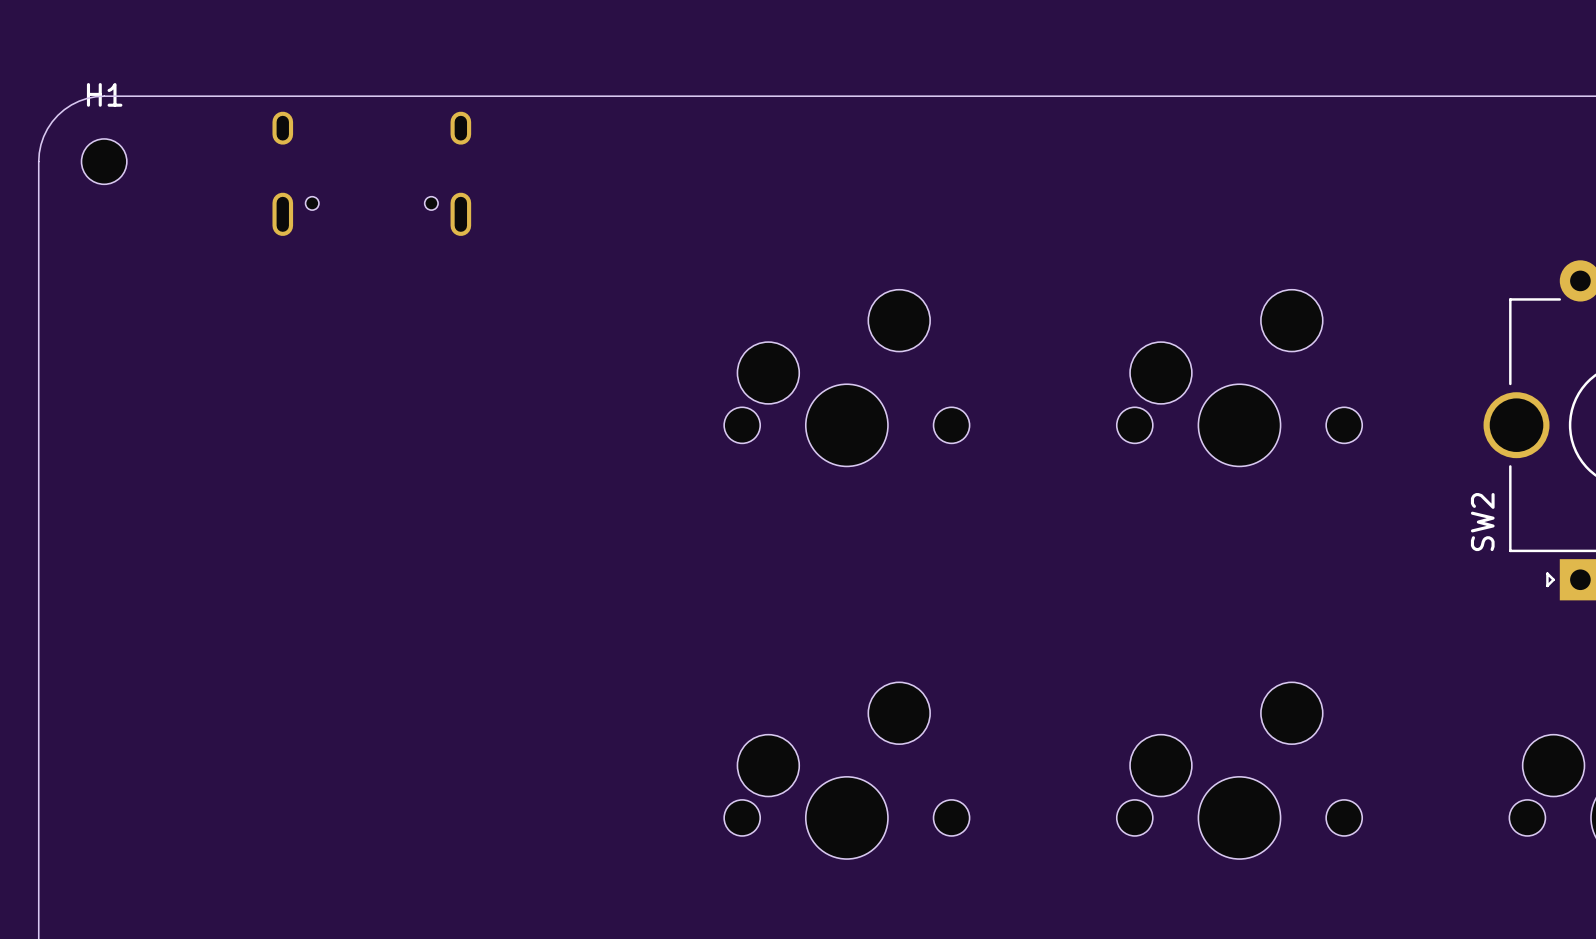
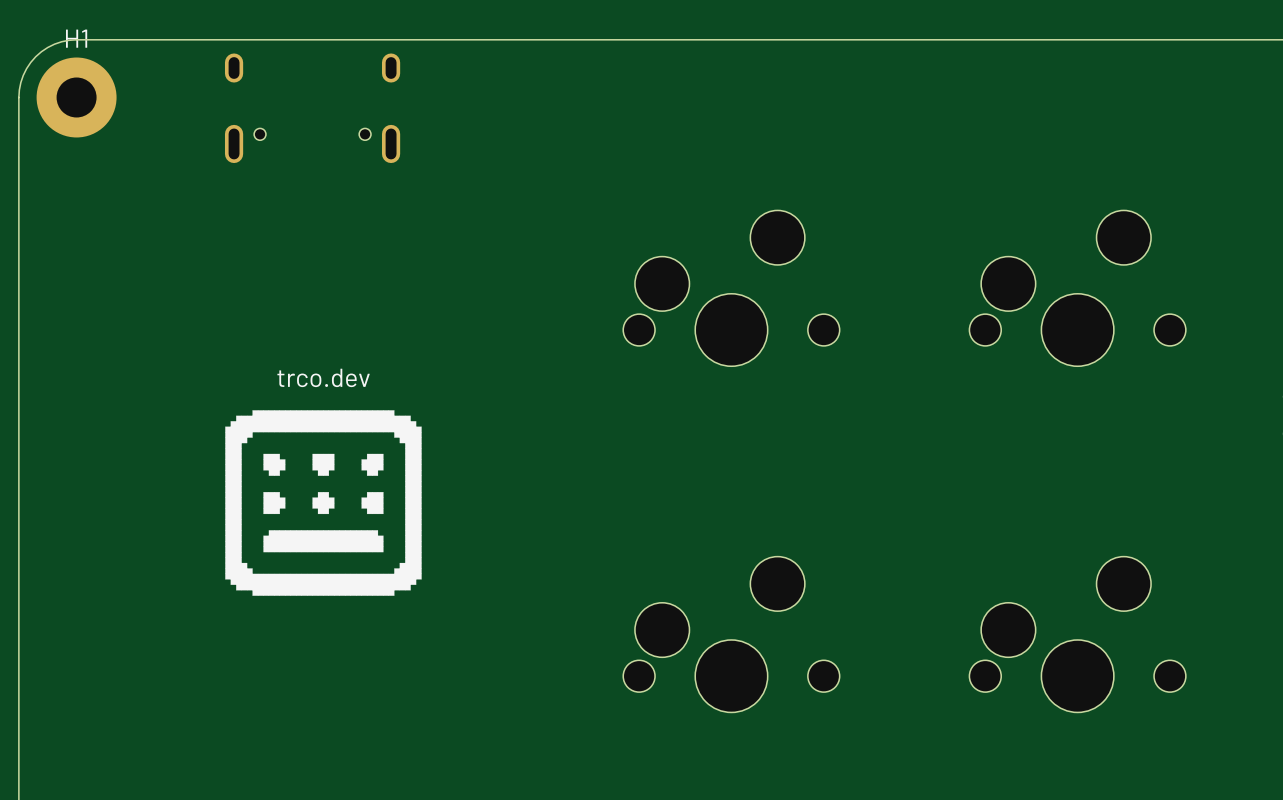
H1 footprint: [81, 138, 127, 185] -> [36, 57, 117, 138]
text: none -> trco.dev (323, 377)
drawing: none -> [225, 410, 422, 596]

